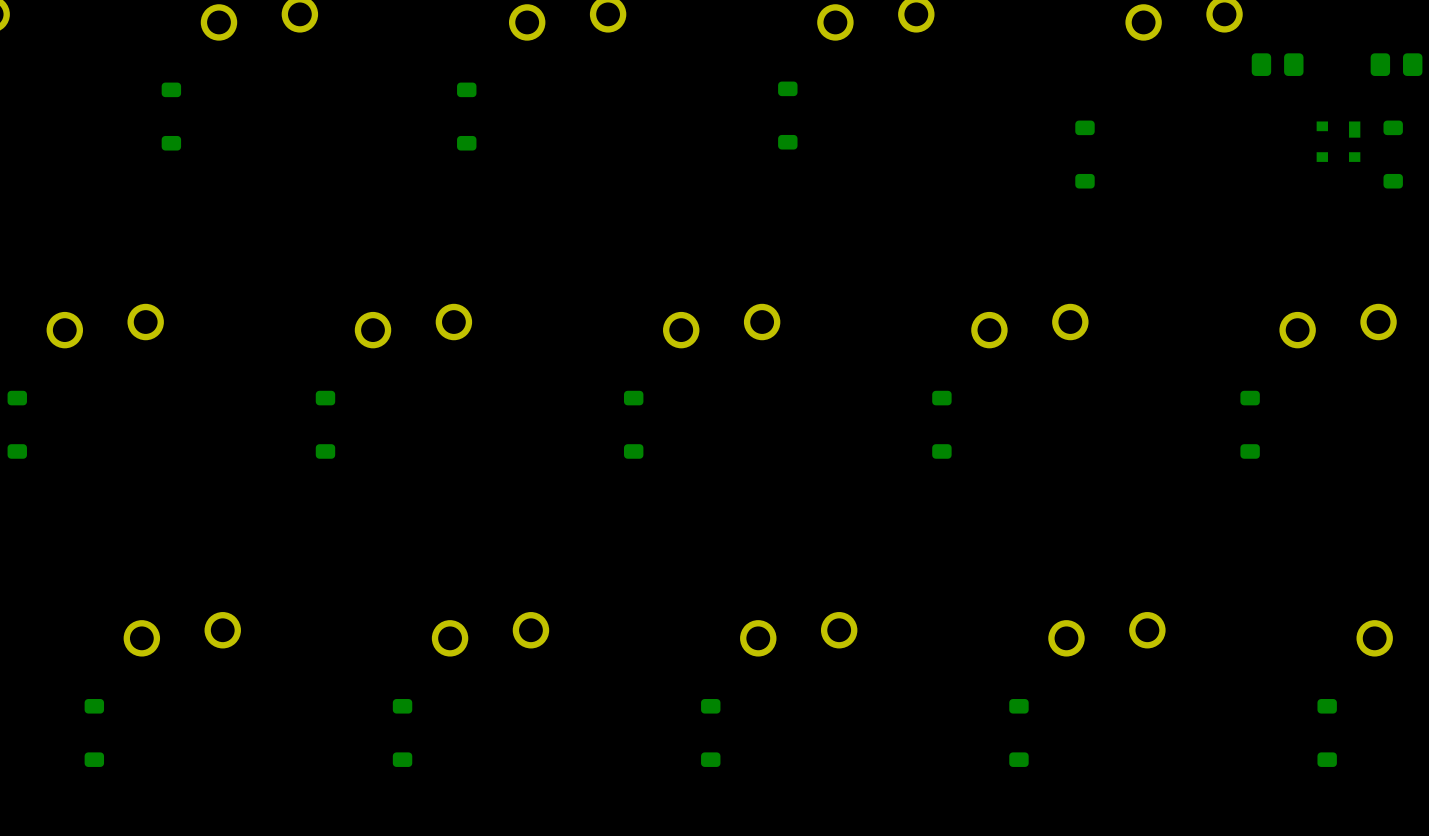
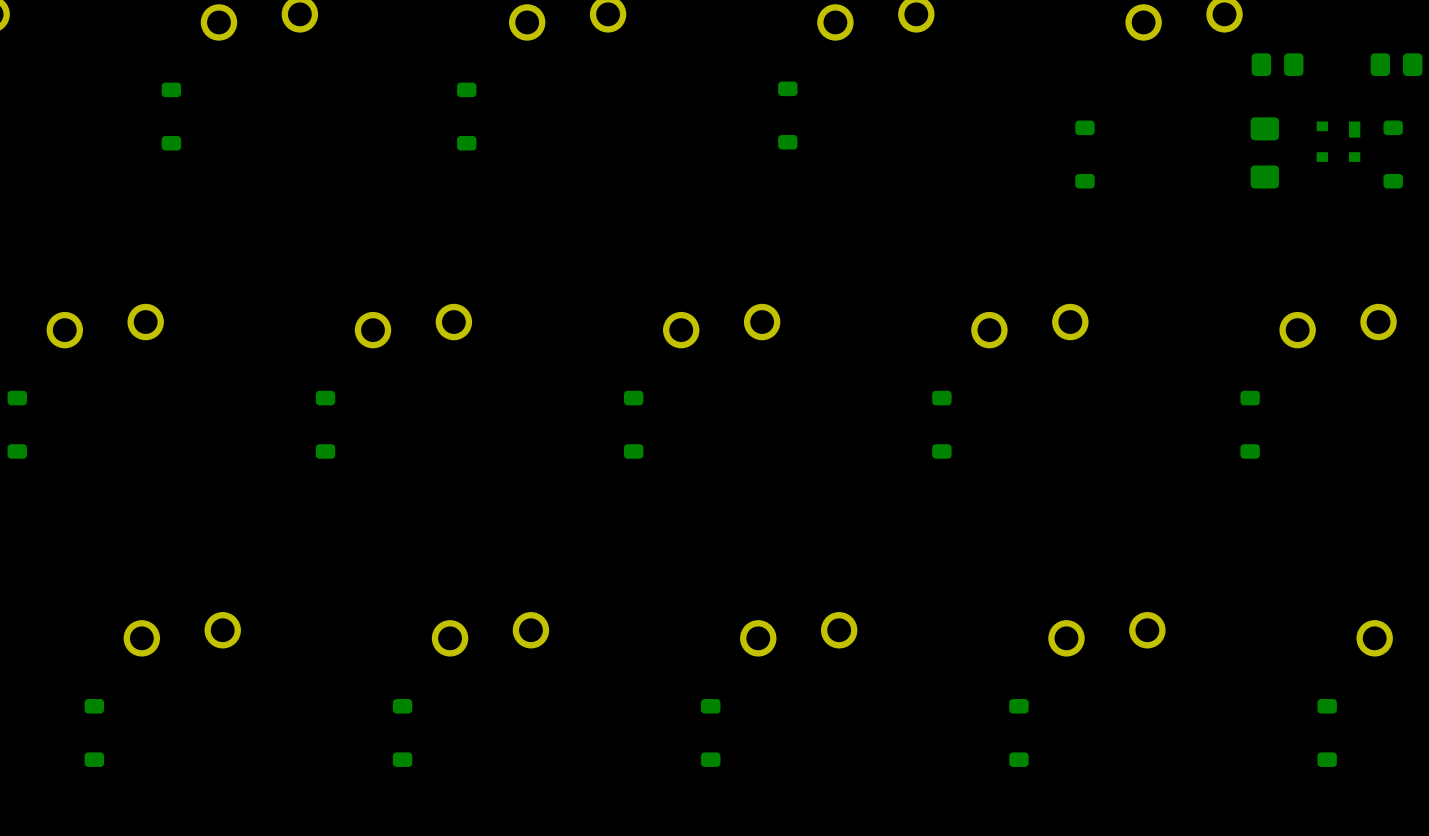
part: none -> (1264, 152)

